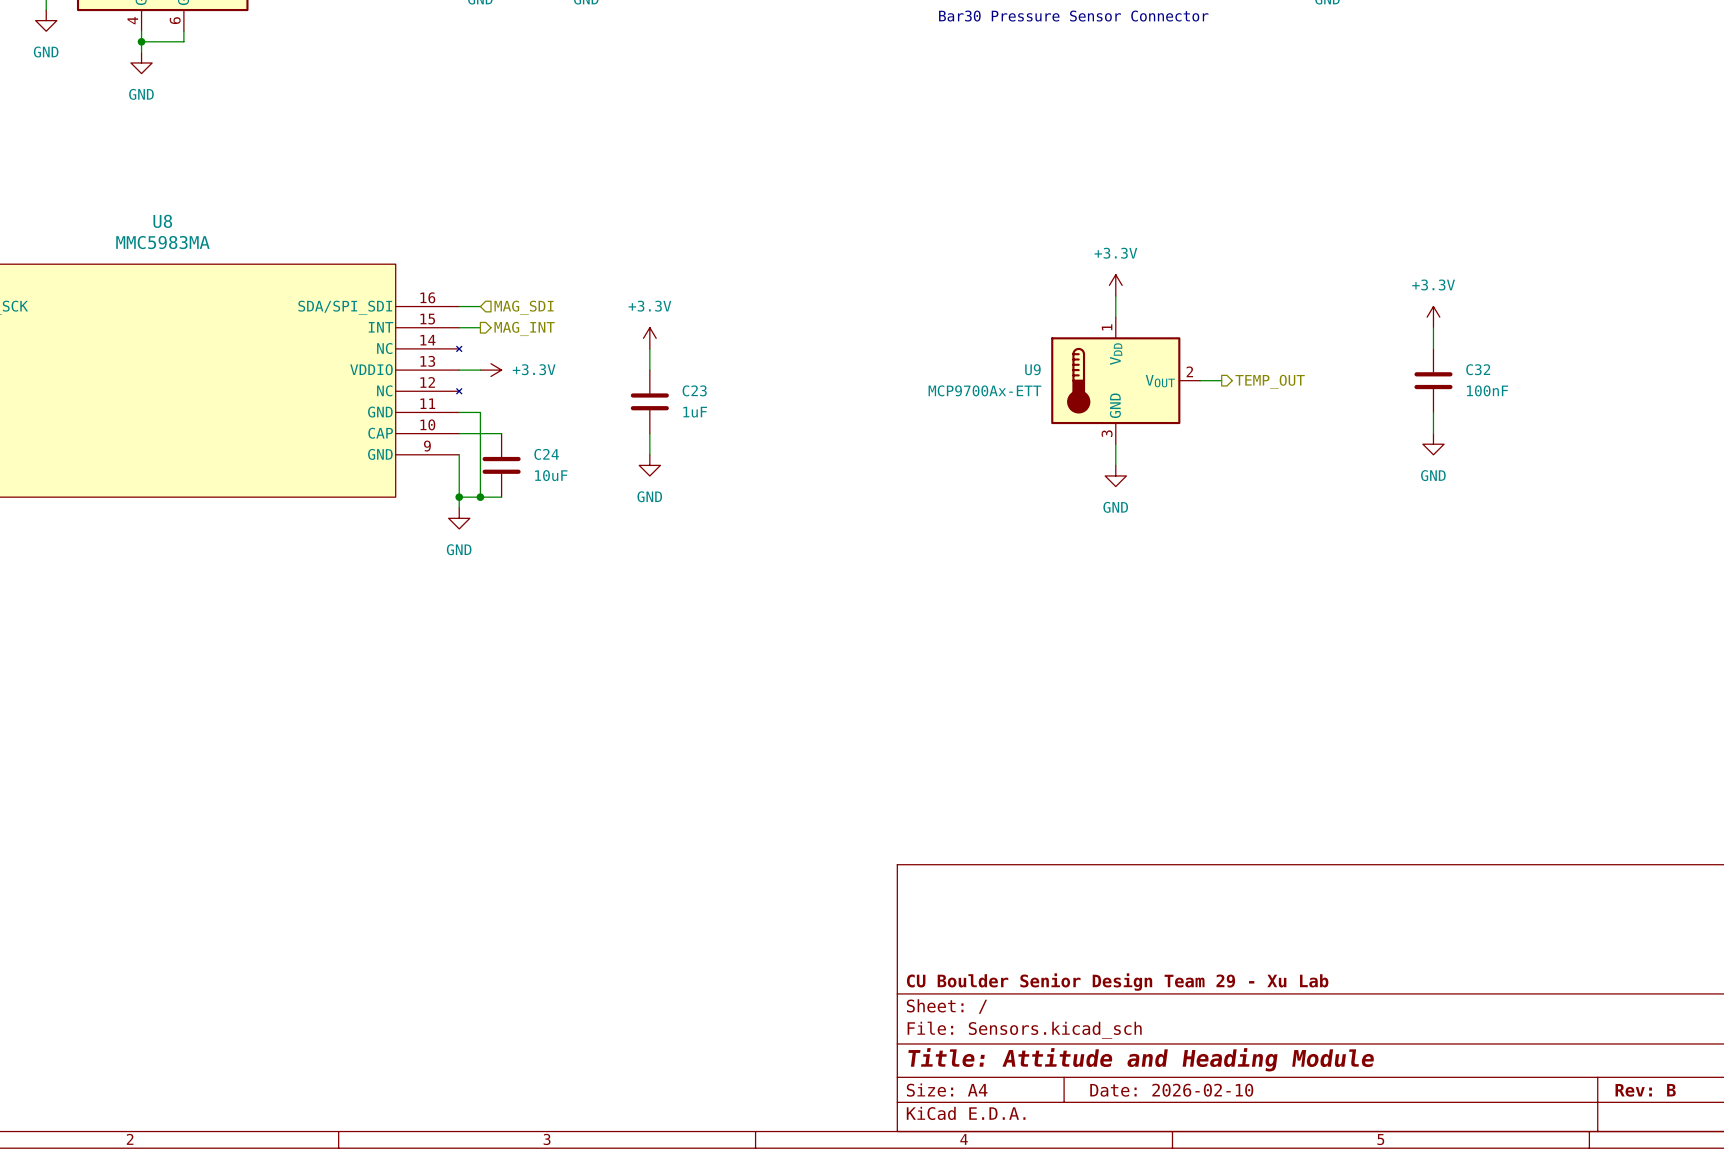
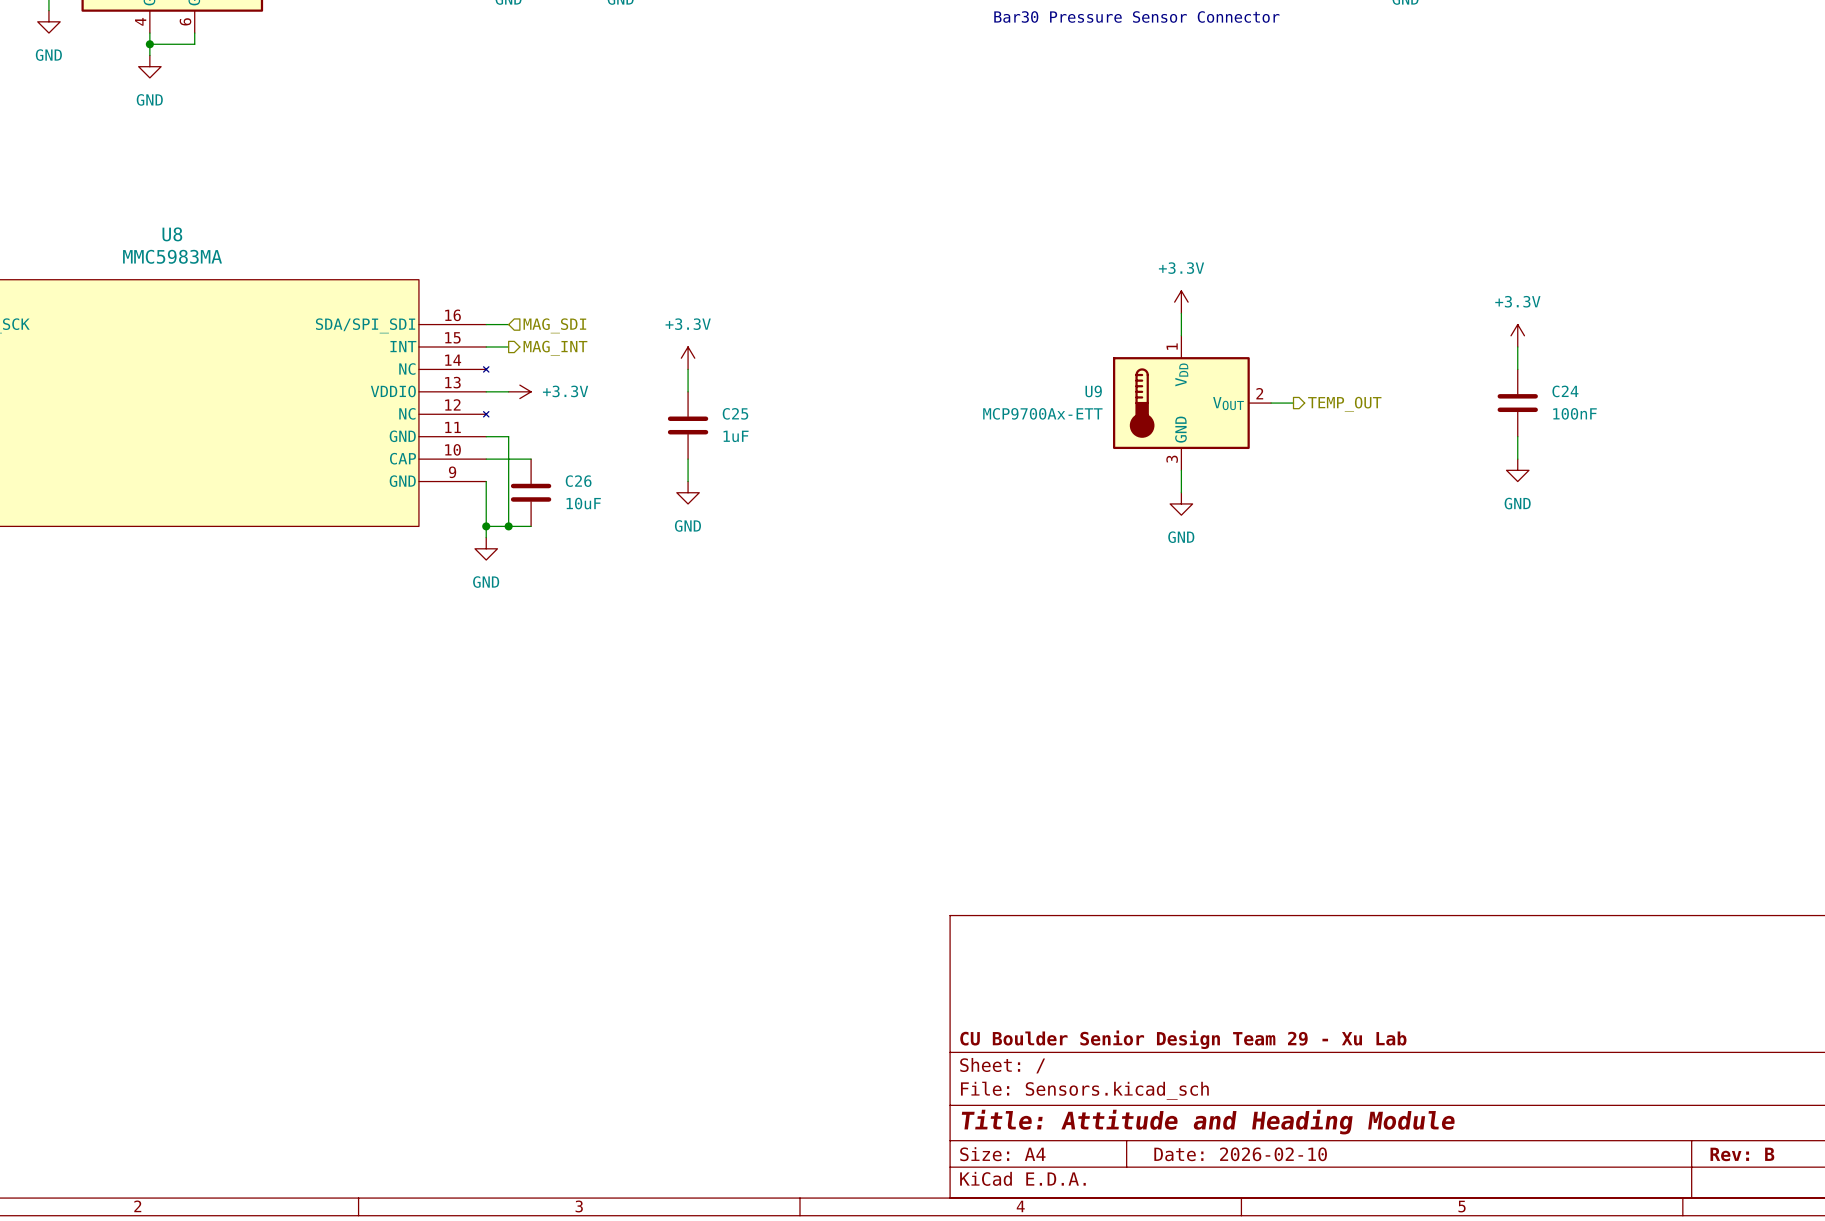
C32 name: C32 (1478, 369) -> C24 (1565, 391)
C23 name: C23 (694, 390) -> C25 (735, 413)
C24 name: C24 (546, 454) -> C26 (578, 481)

